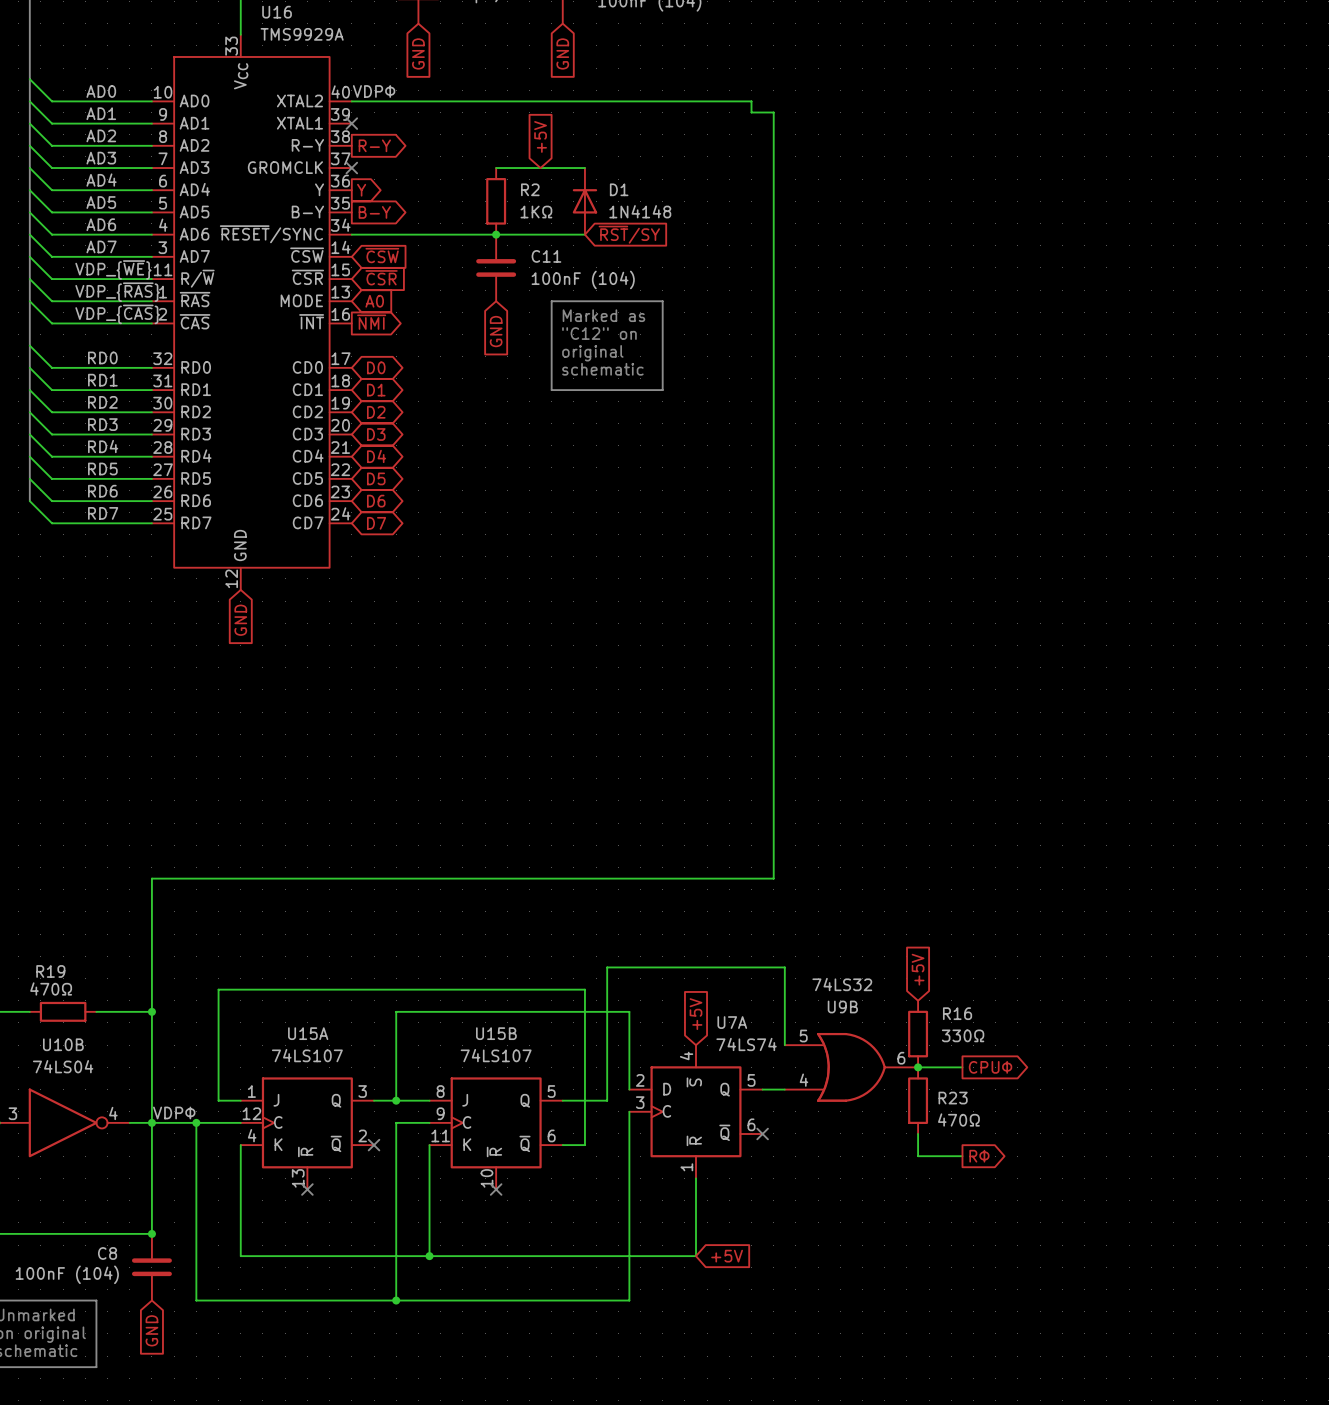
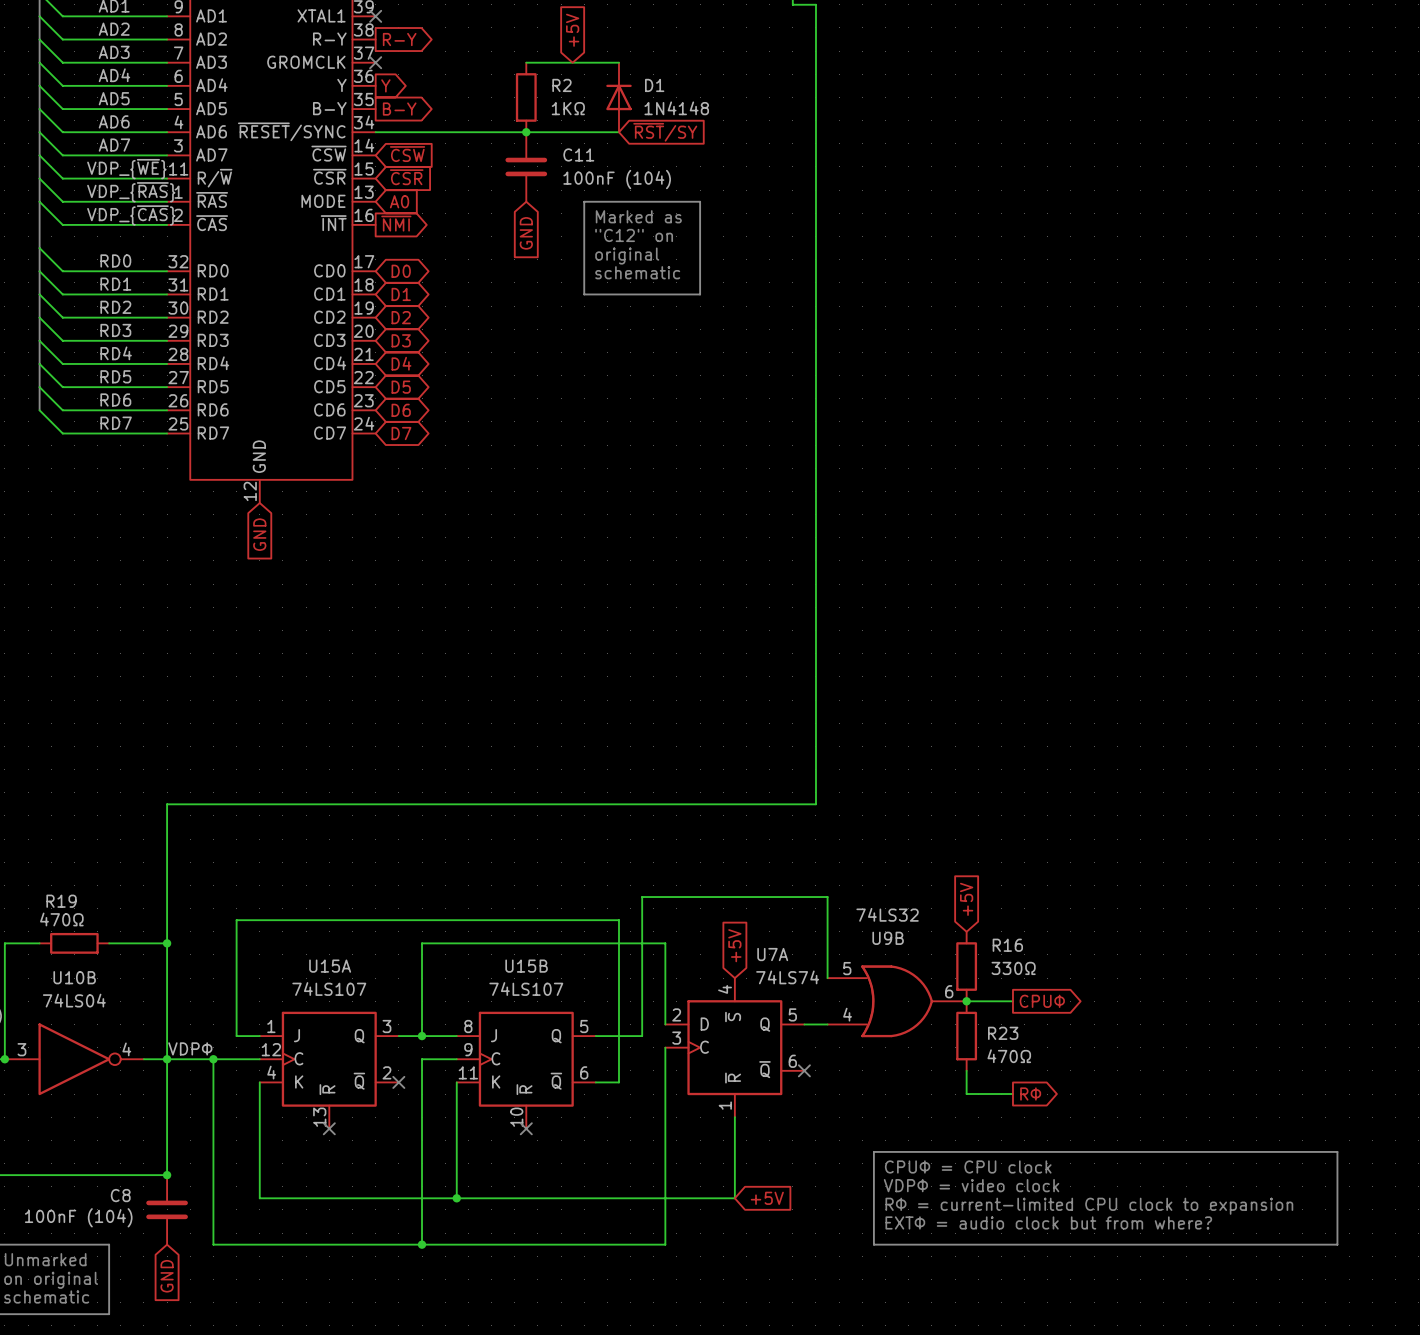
line: none -> (873, 1151) (1337, 1151) (1337, 1244) (873, 1244) (873, 1151)
text: none -> CPUΦ = CPU clock (968, 1166)
text: none -> VDPΦ = video clock (971, 1185)
text: none -> RΦ = current-limited CPU clock to expansion (1089, 1206)
text: none -> EXTΦ = audio clock but from where? (1048, 1222)

